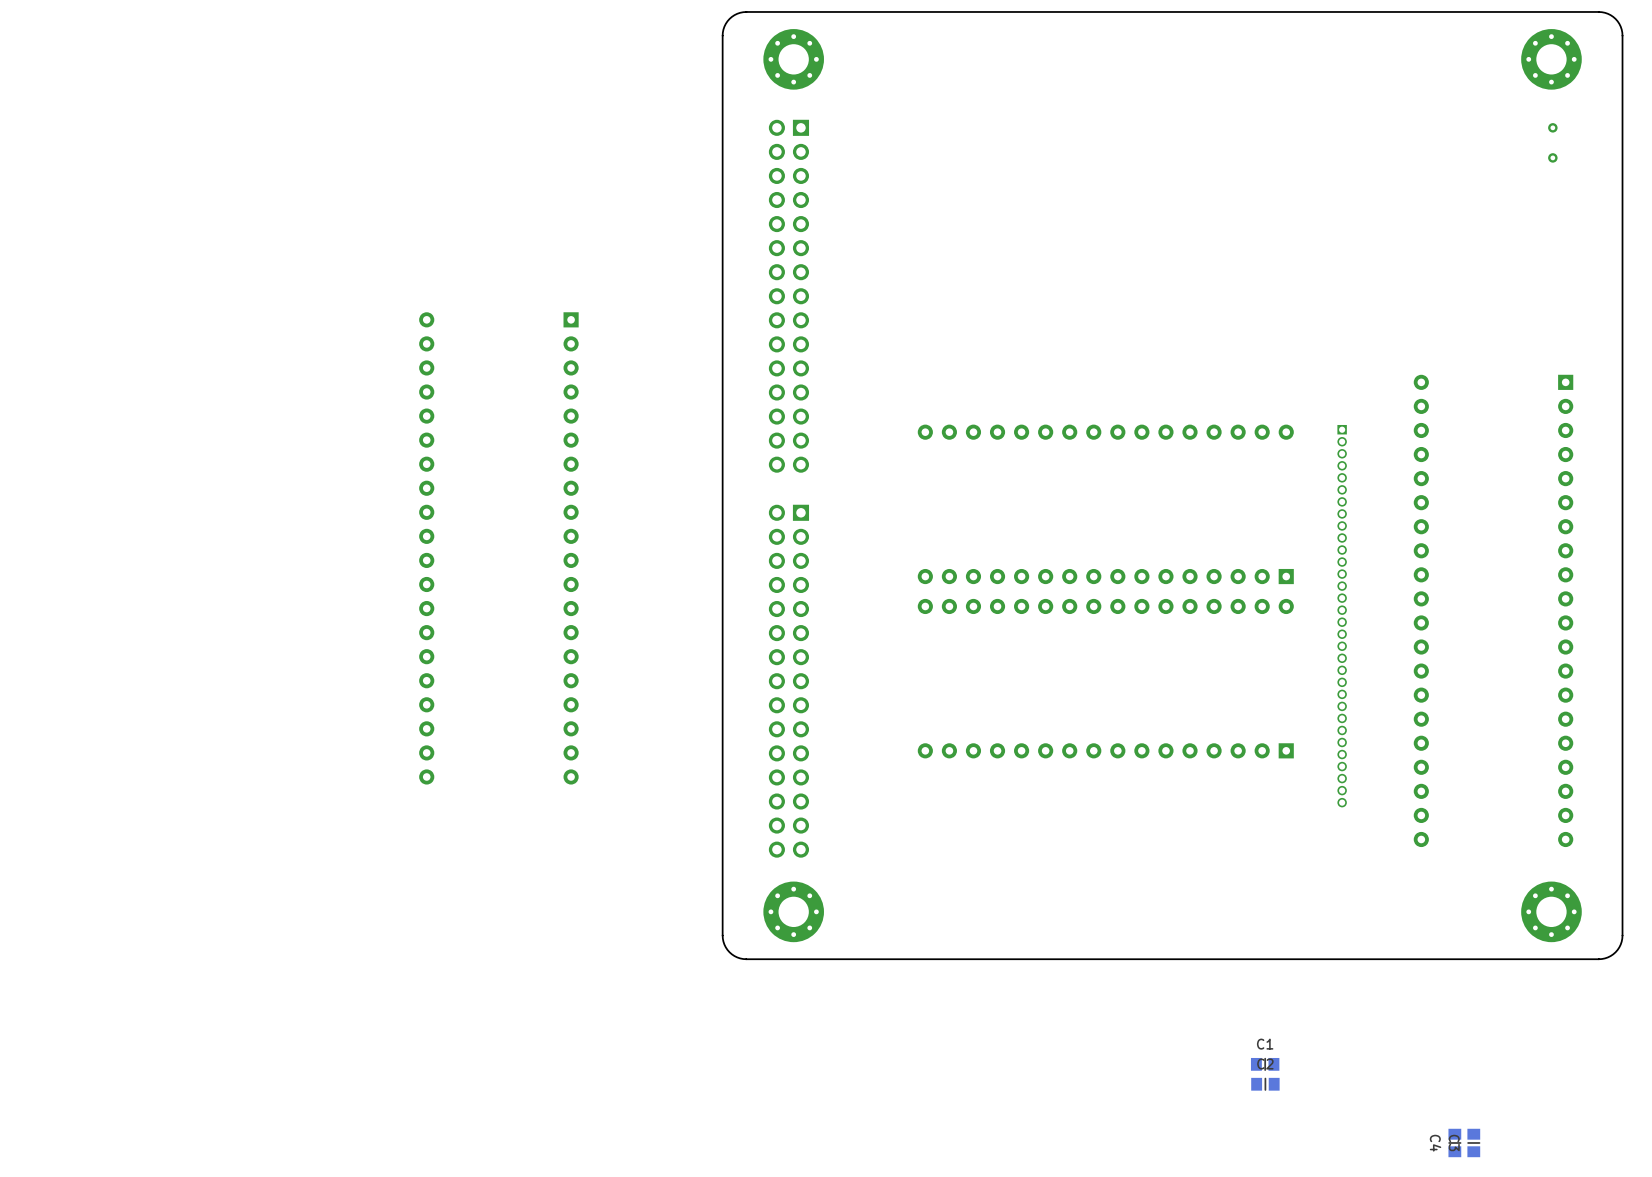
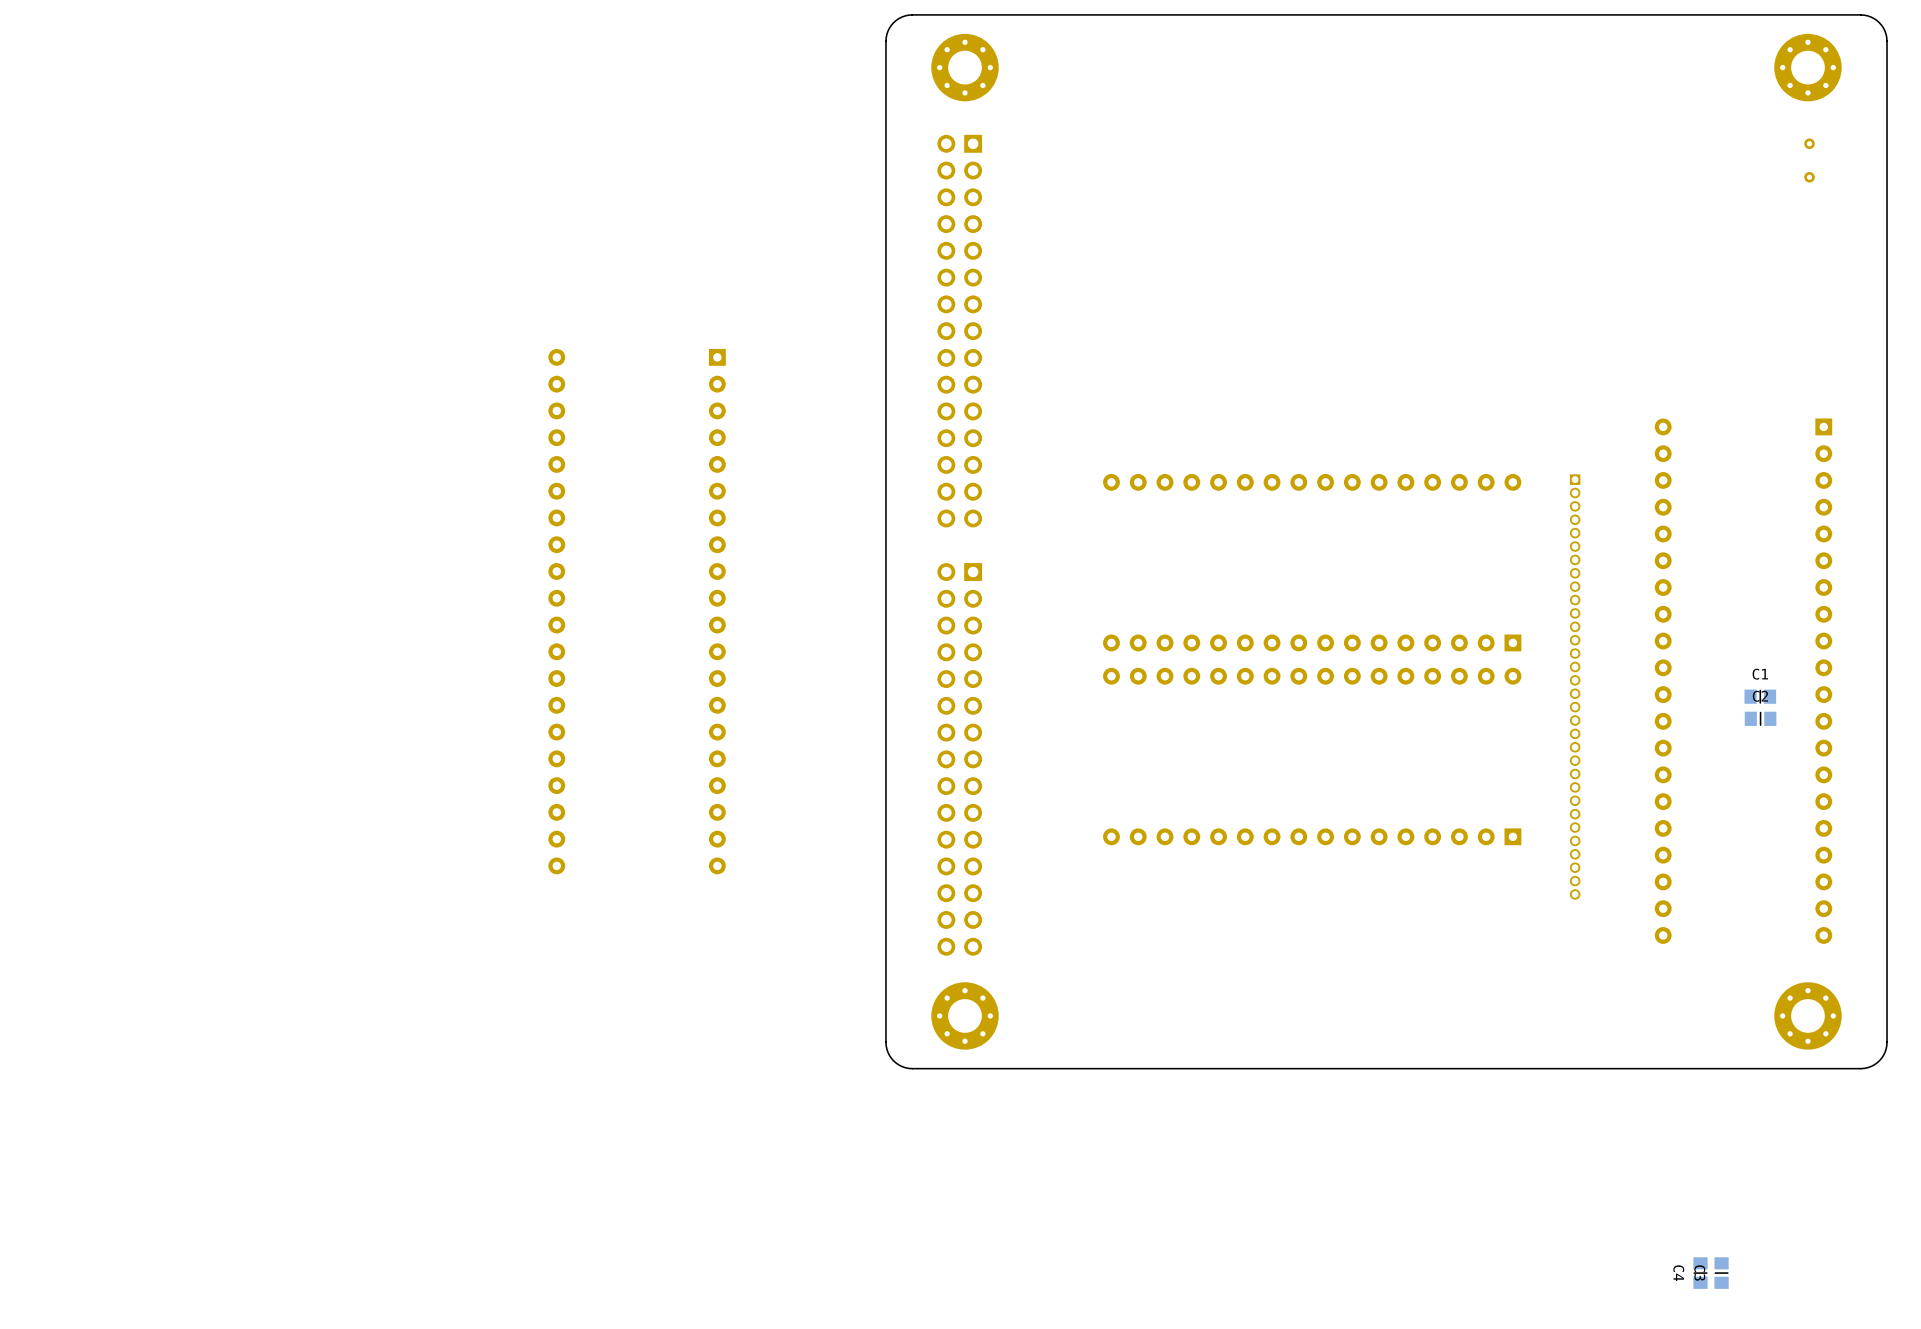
C1 position: (1265, 1064) -> (1760, 696)
C2 position: (1265, 1084) -> (1760, 718)

